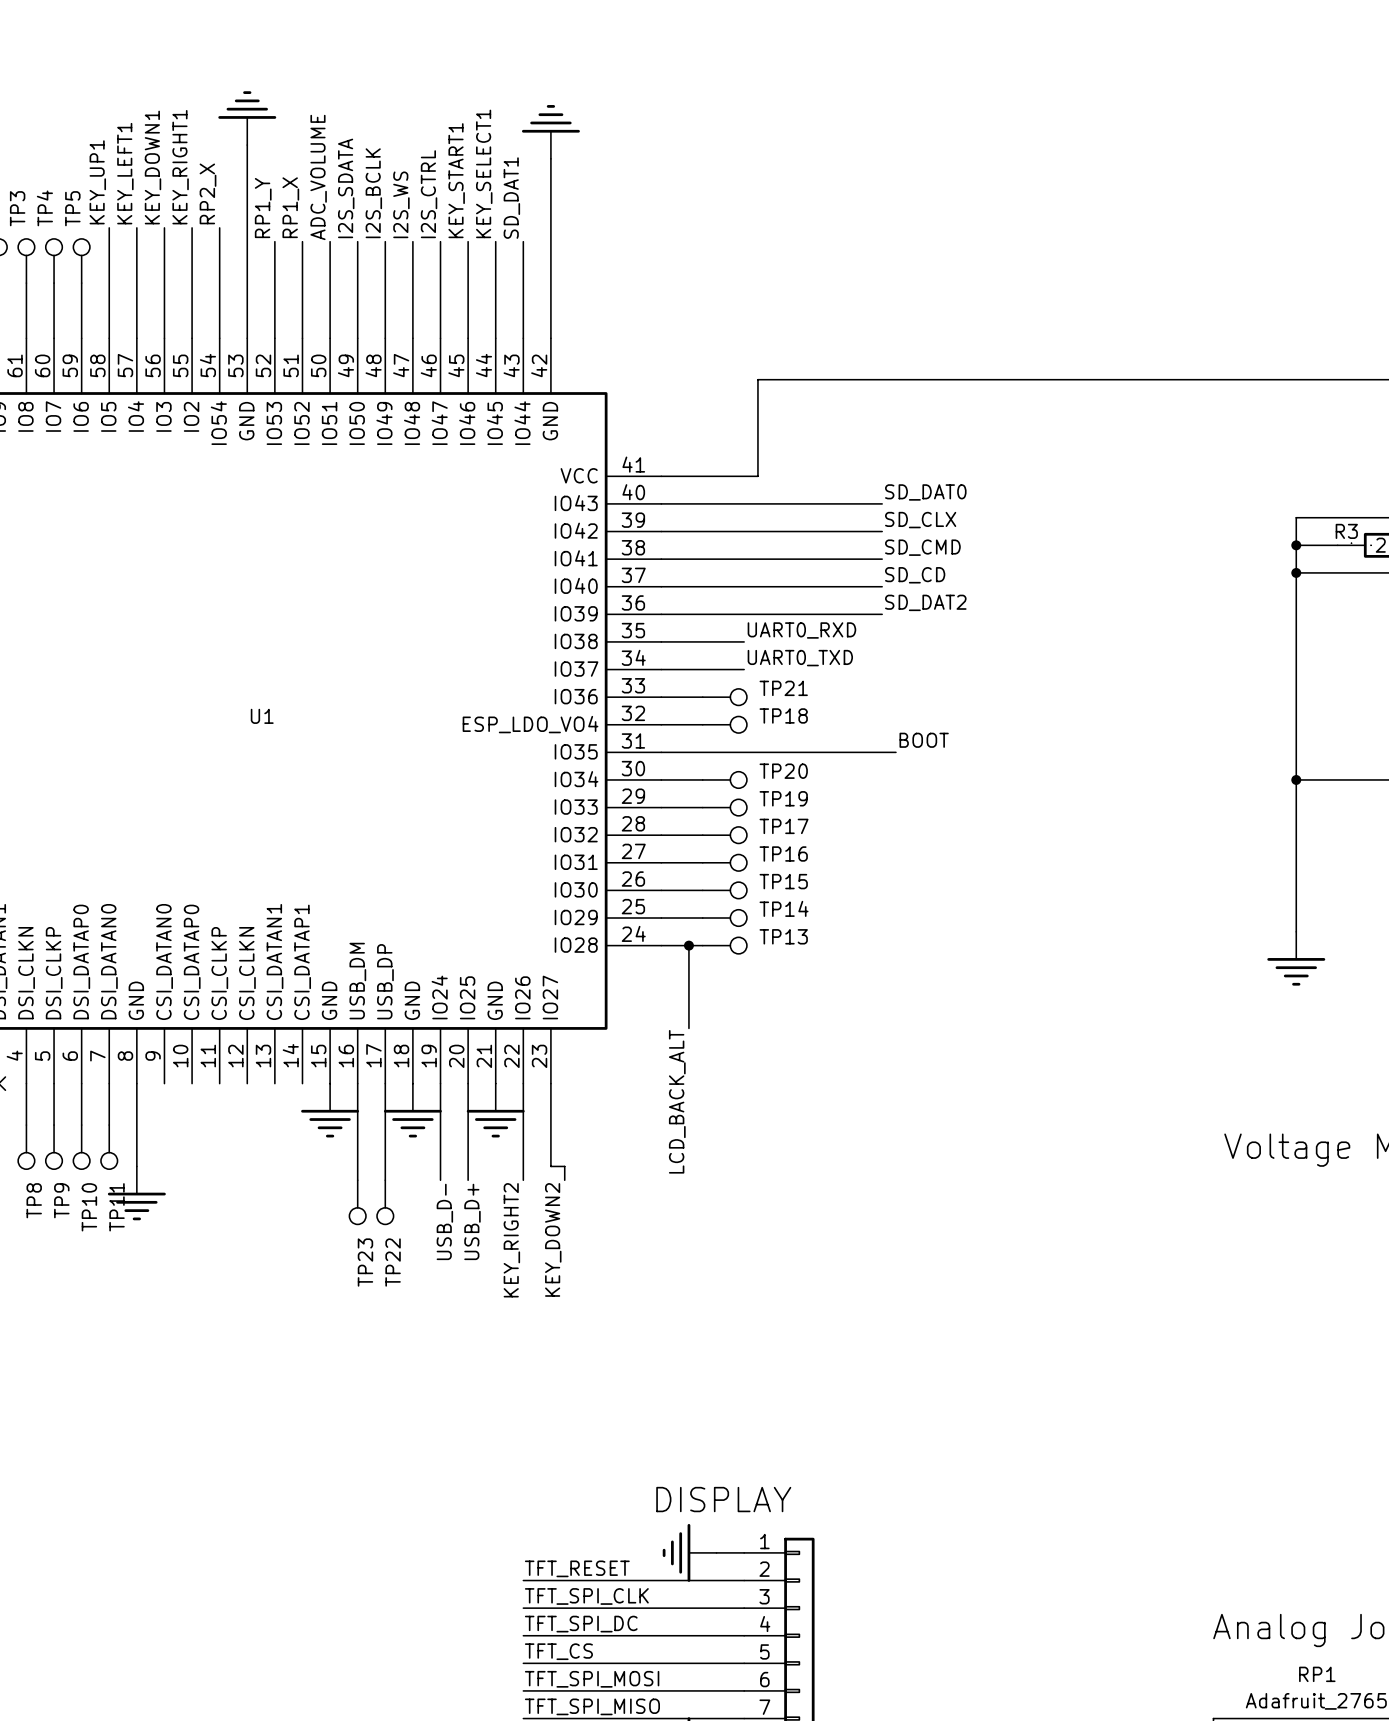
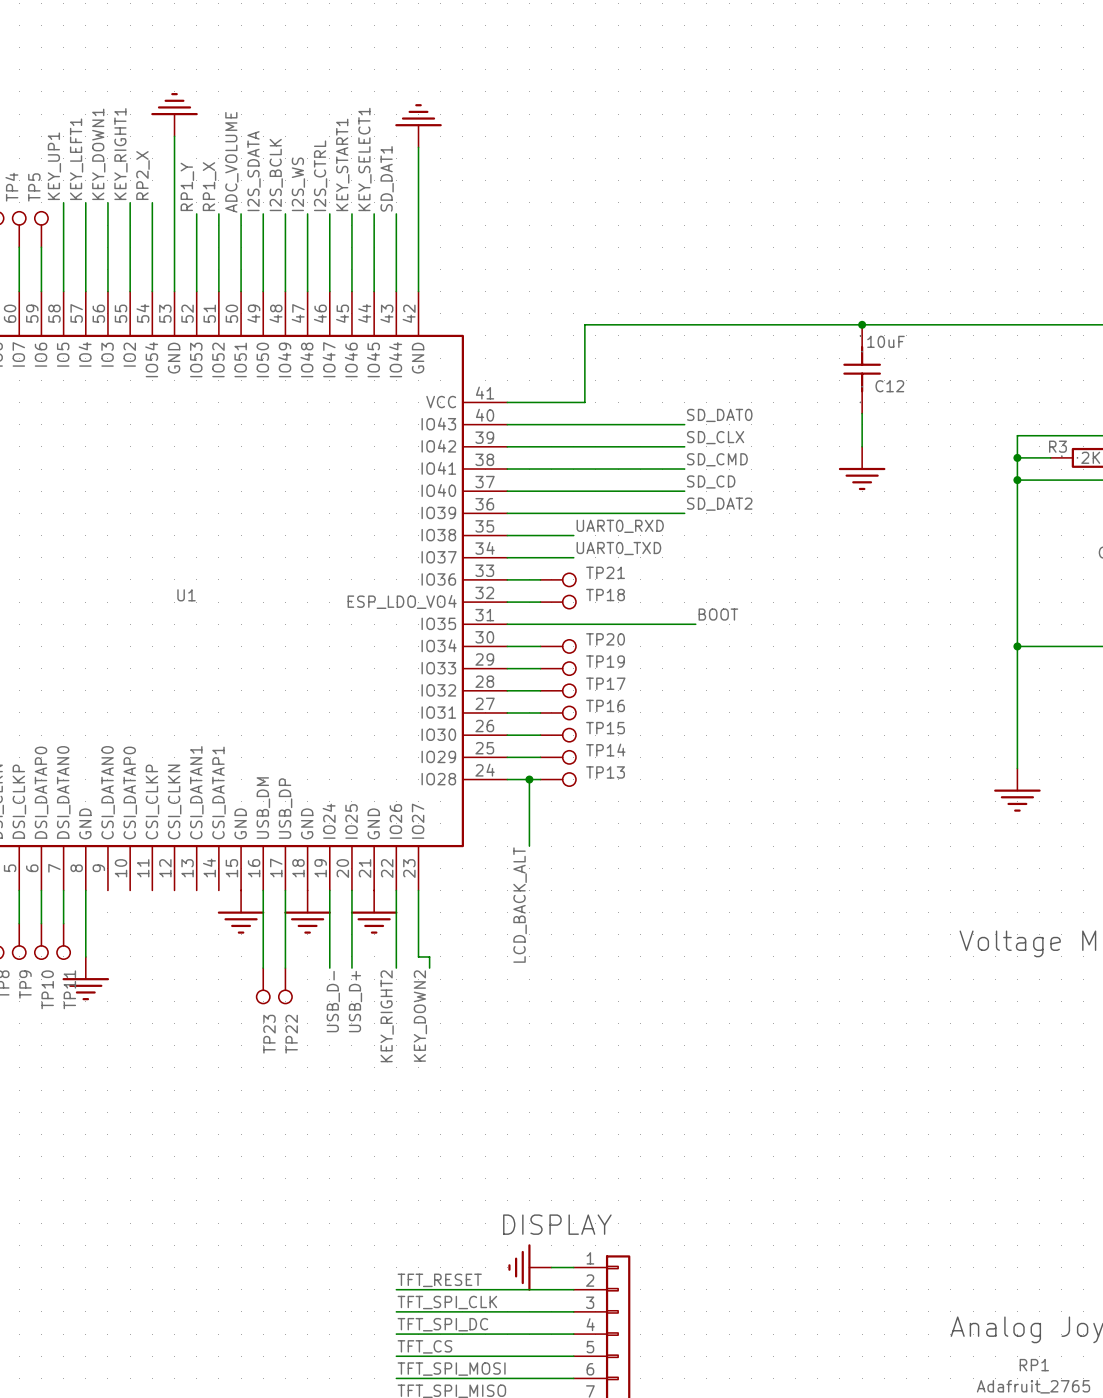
junction: none -> (862, 324)
C12: none -> 10uF (862, 369)
wire: none -> (862, 413) (862, 446)
power symbol: none -> (862, 468)

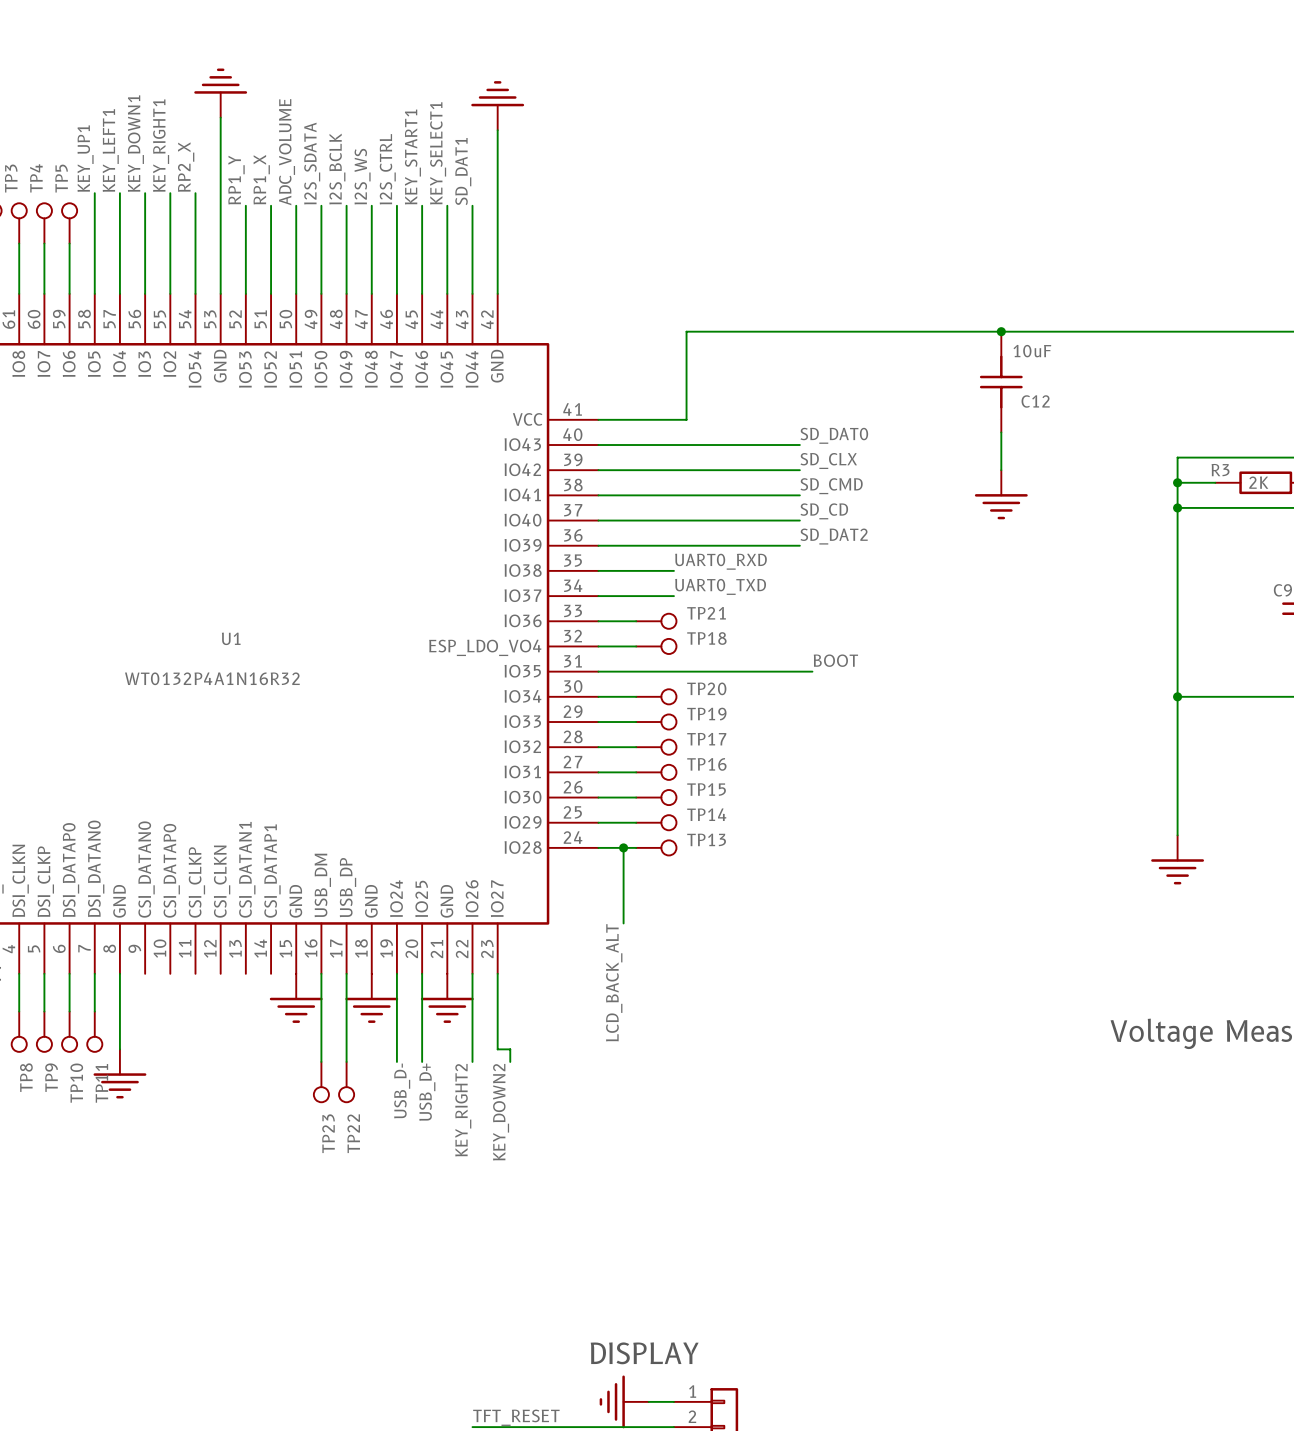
U1 value: none -> WT0132P4A1N16R32 (212, 678)

